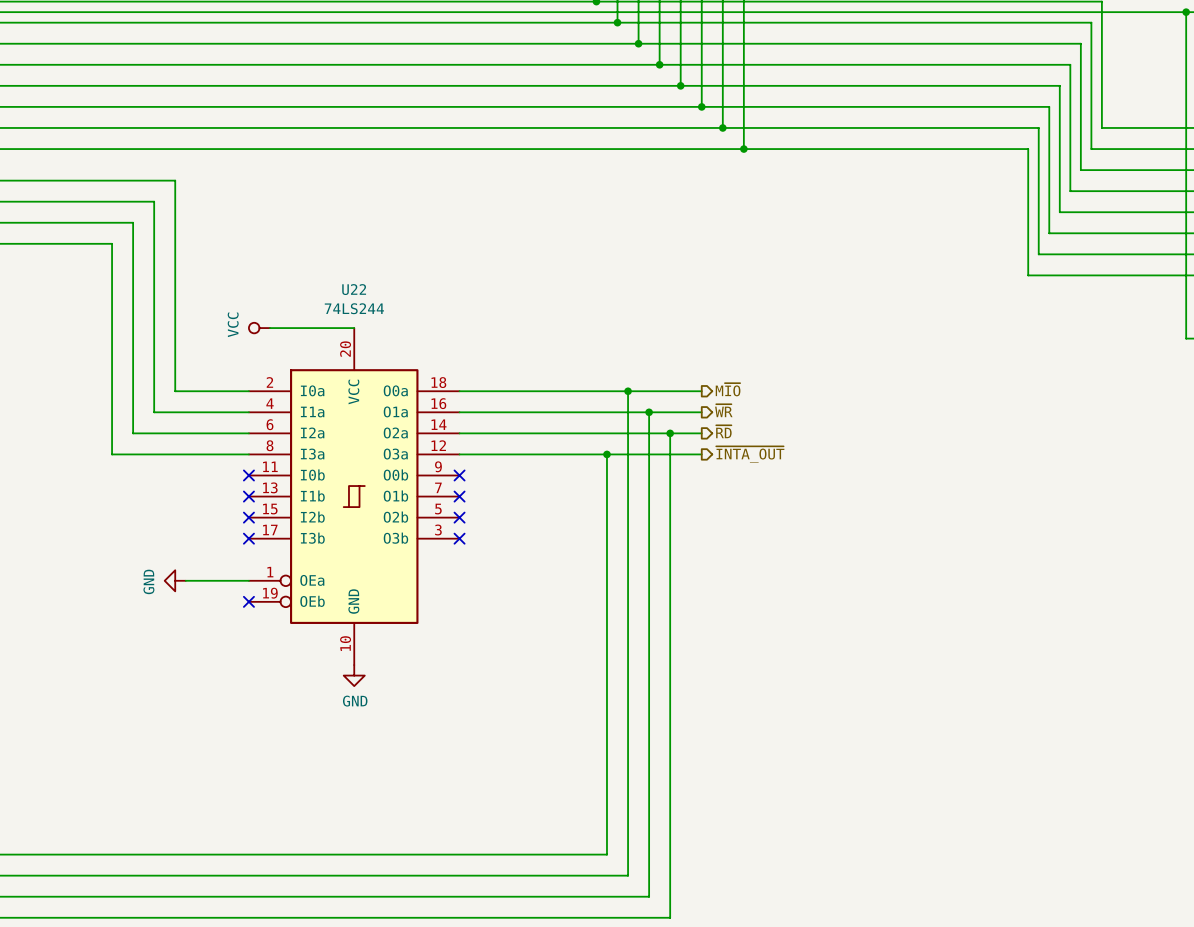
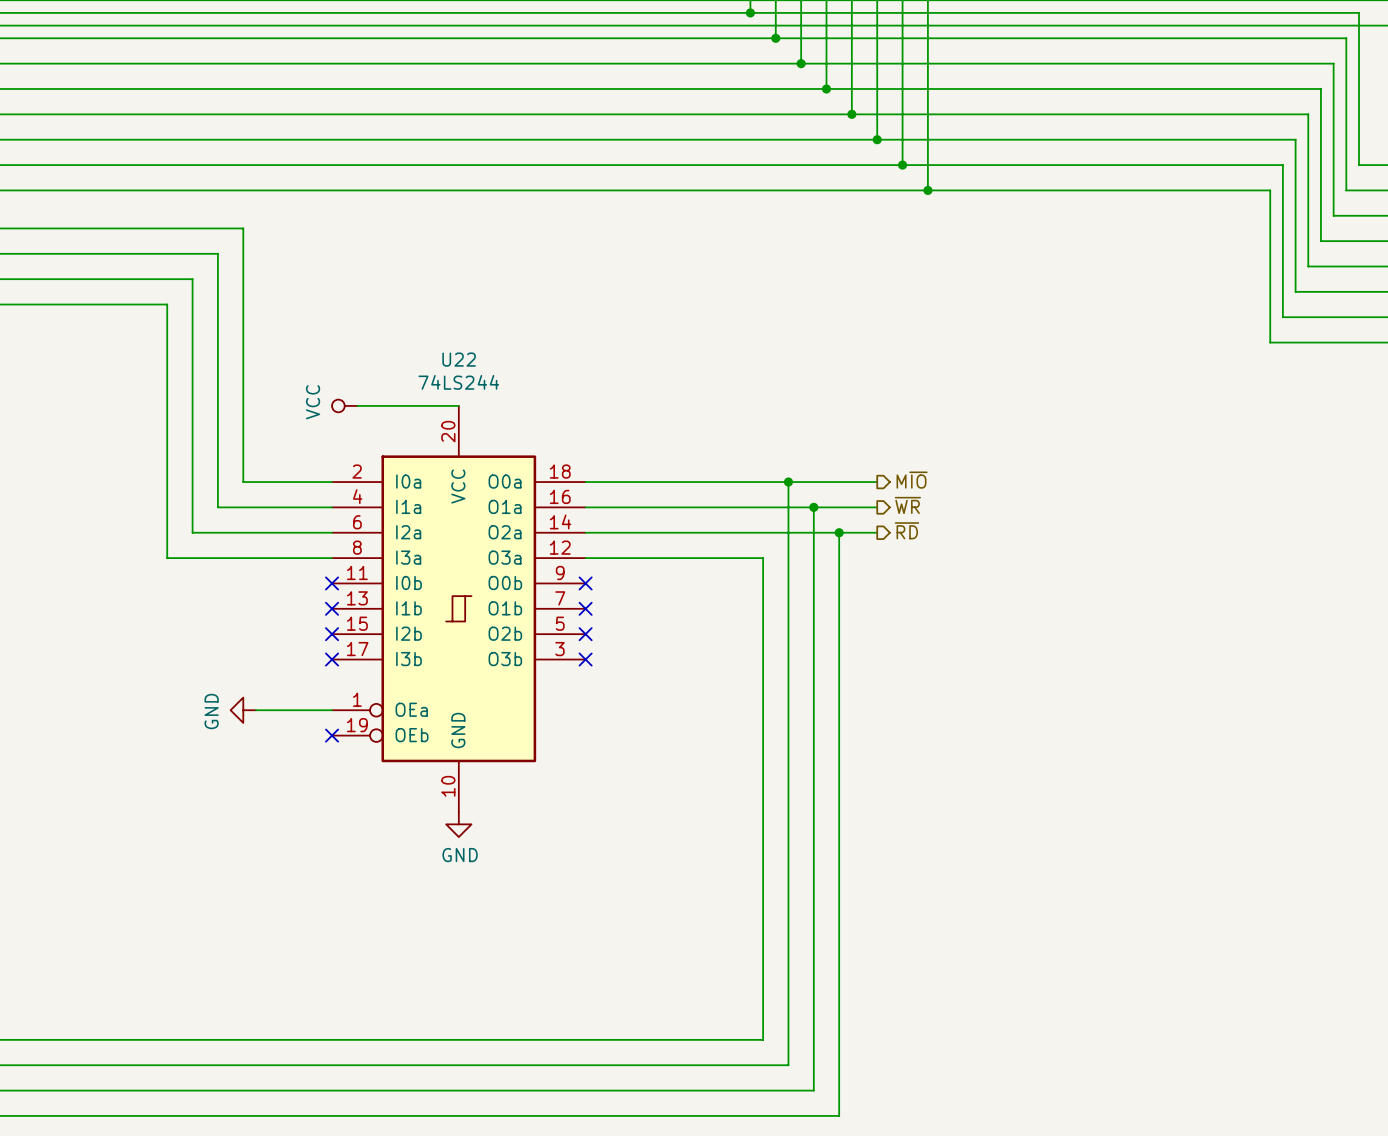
wire: (606, 454) (701, 454) -> none
junction: (606, 454) -> none
hierarchical label: ~{INTA_OUT} (750, 454) -> none

